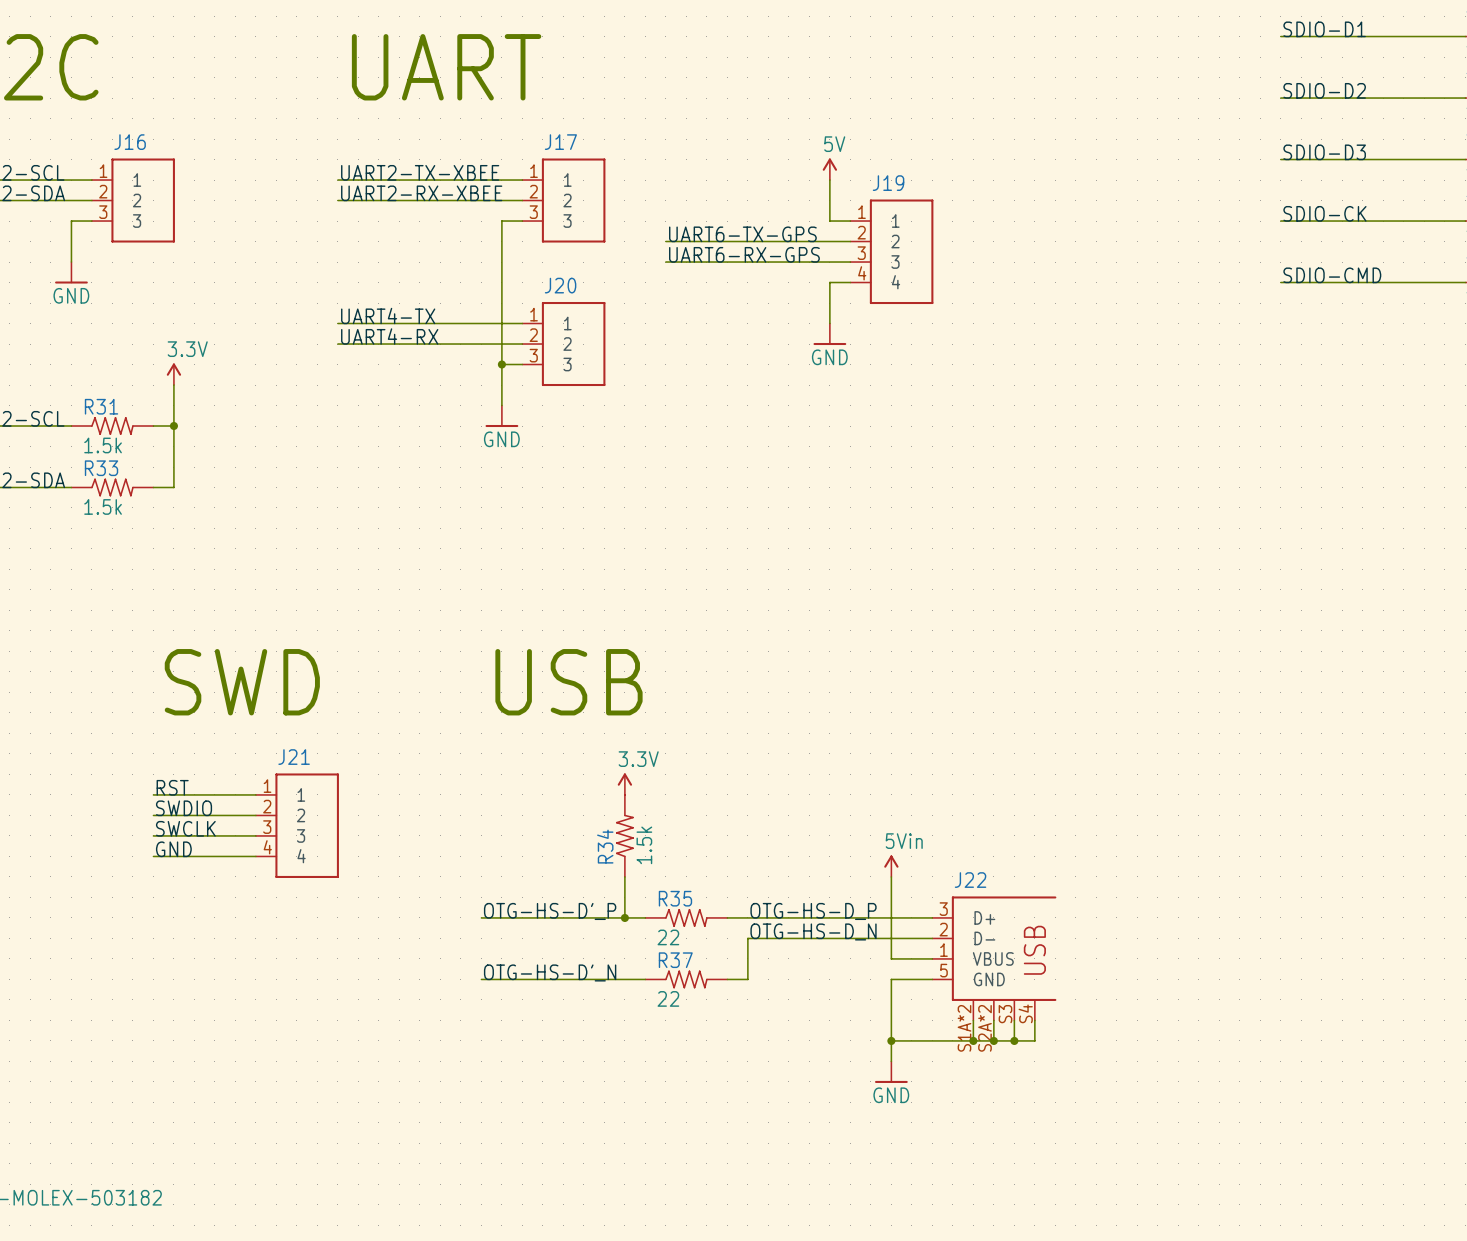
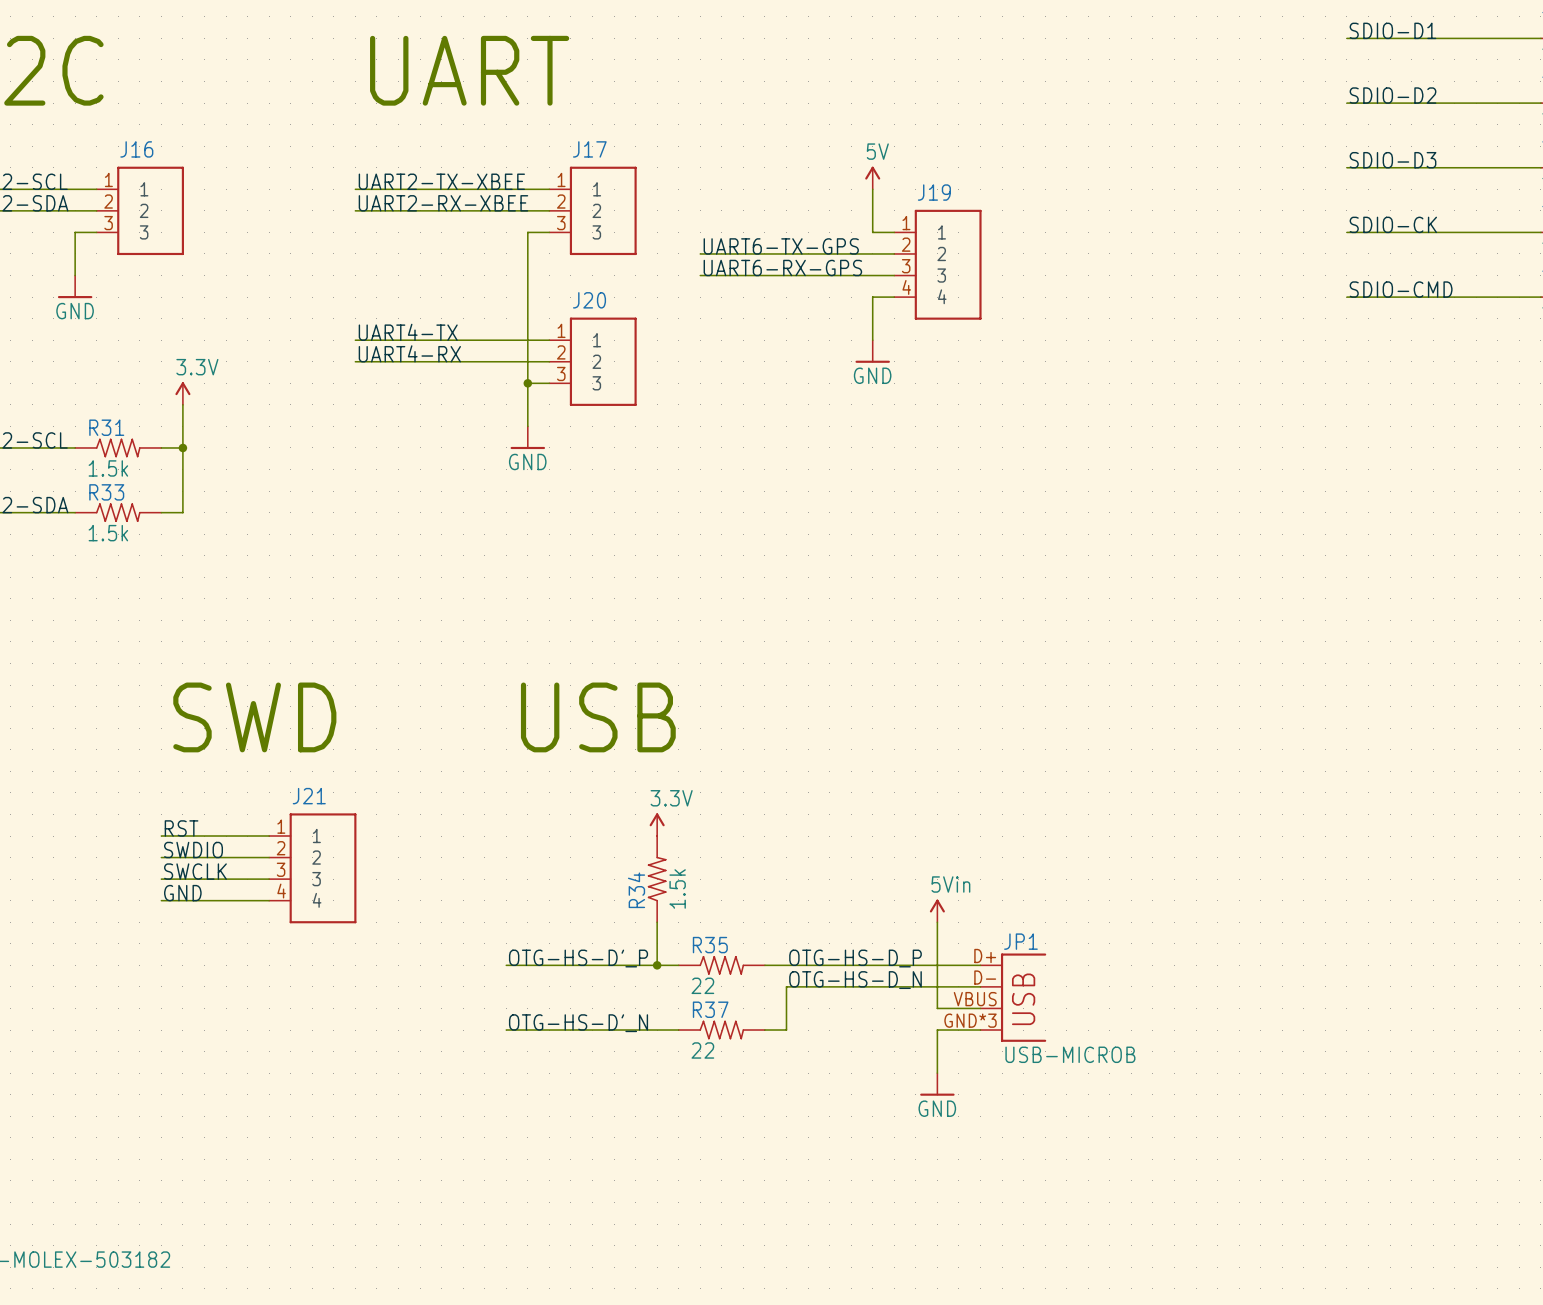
JP1: none -> USB-MICROB (1013, 997)
J22: (994, 958) -> none
wire: (973, 1020) (973, 1040) -> none
wire: (993, 1020) (993, 1040) -> none
wire: (1014, 1020) (1014, 1040) -> none
wire: (1034, 1020) (1034, 1040) (891, 1040) -> none
junction: (891, 1040) -> none
junction: (973, 1040) -> none
junction: (993, 1040) -> none
junction: (1014, 1040) -> none
power symbol position: GND (891, 1072) -> GND (937, 1084)

